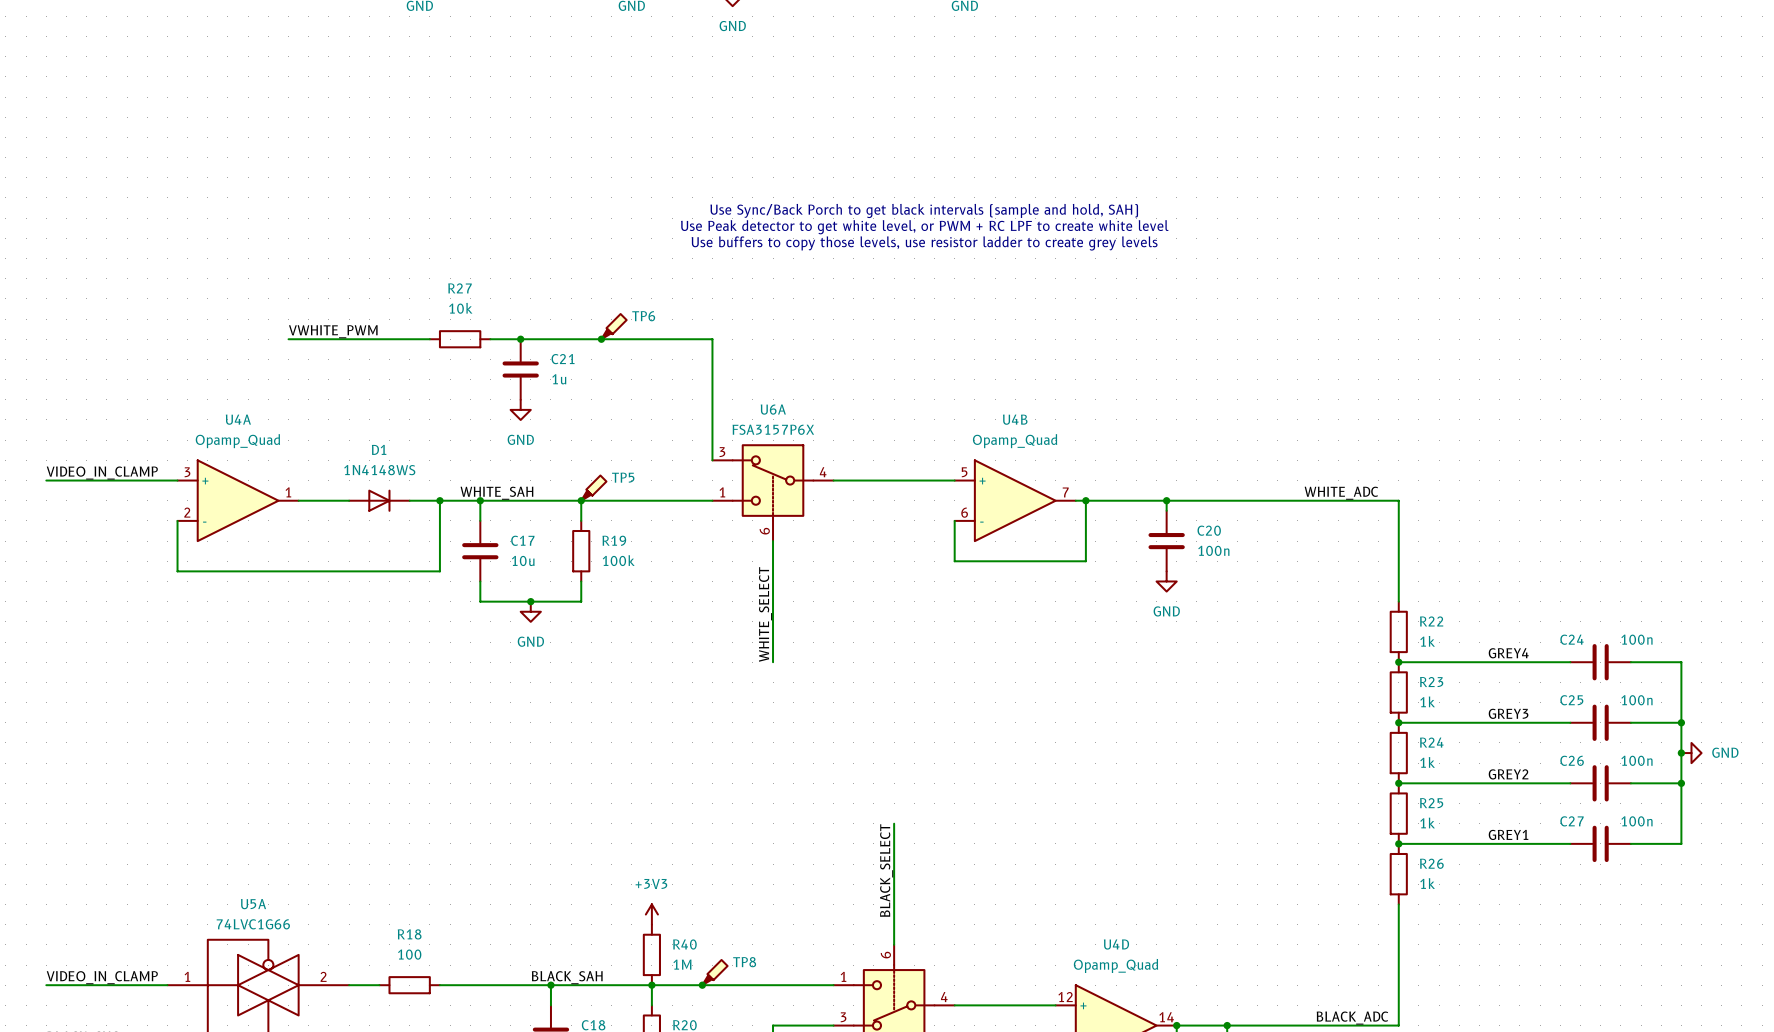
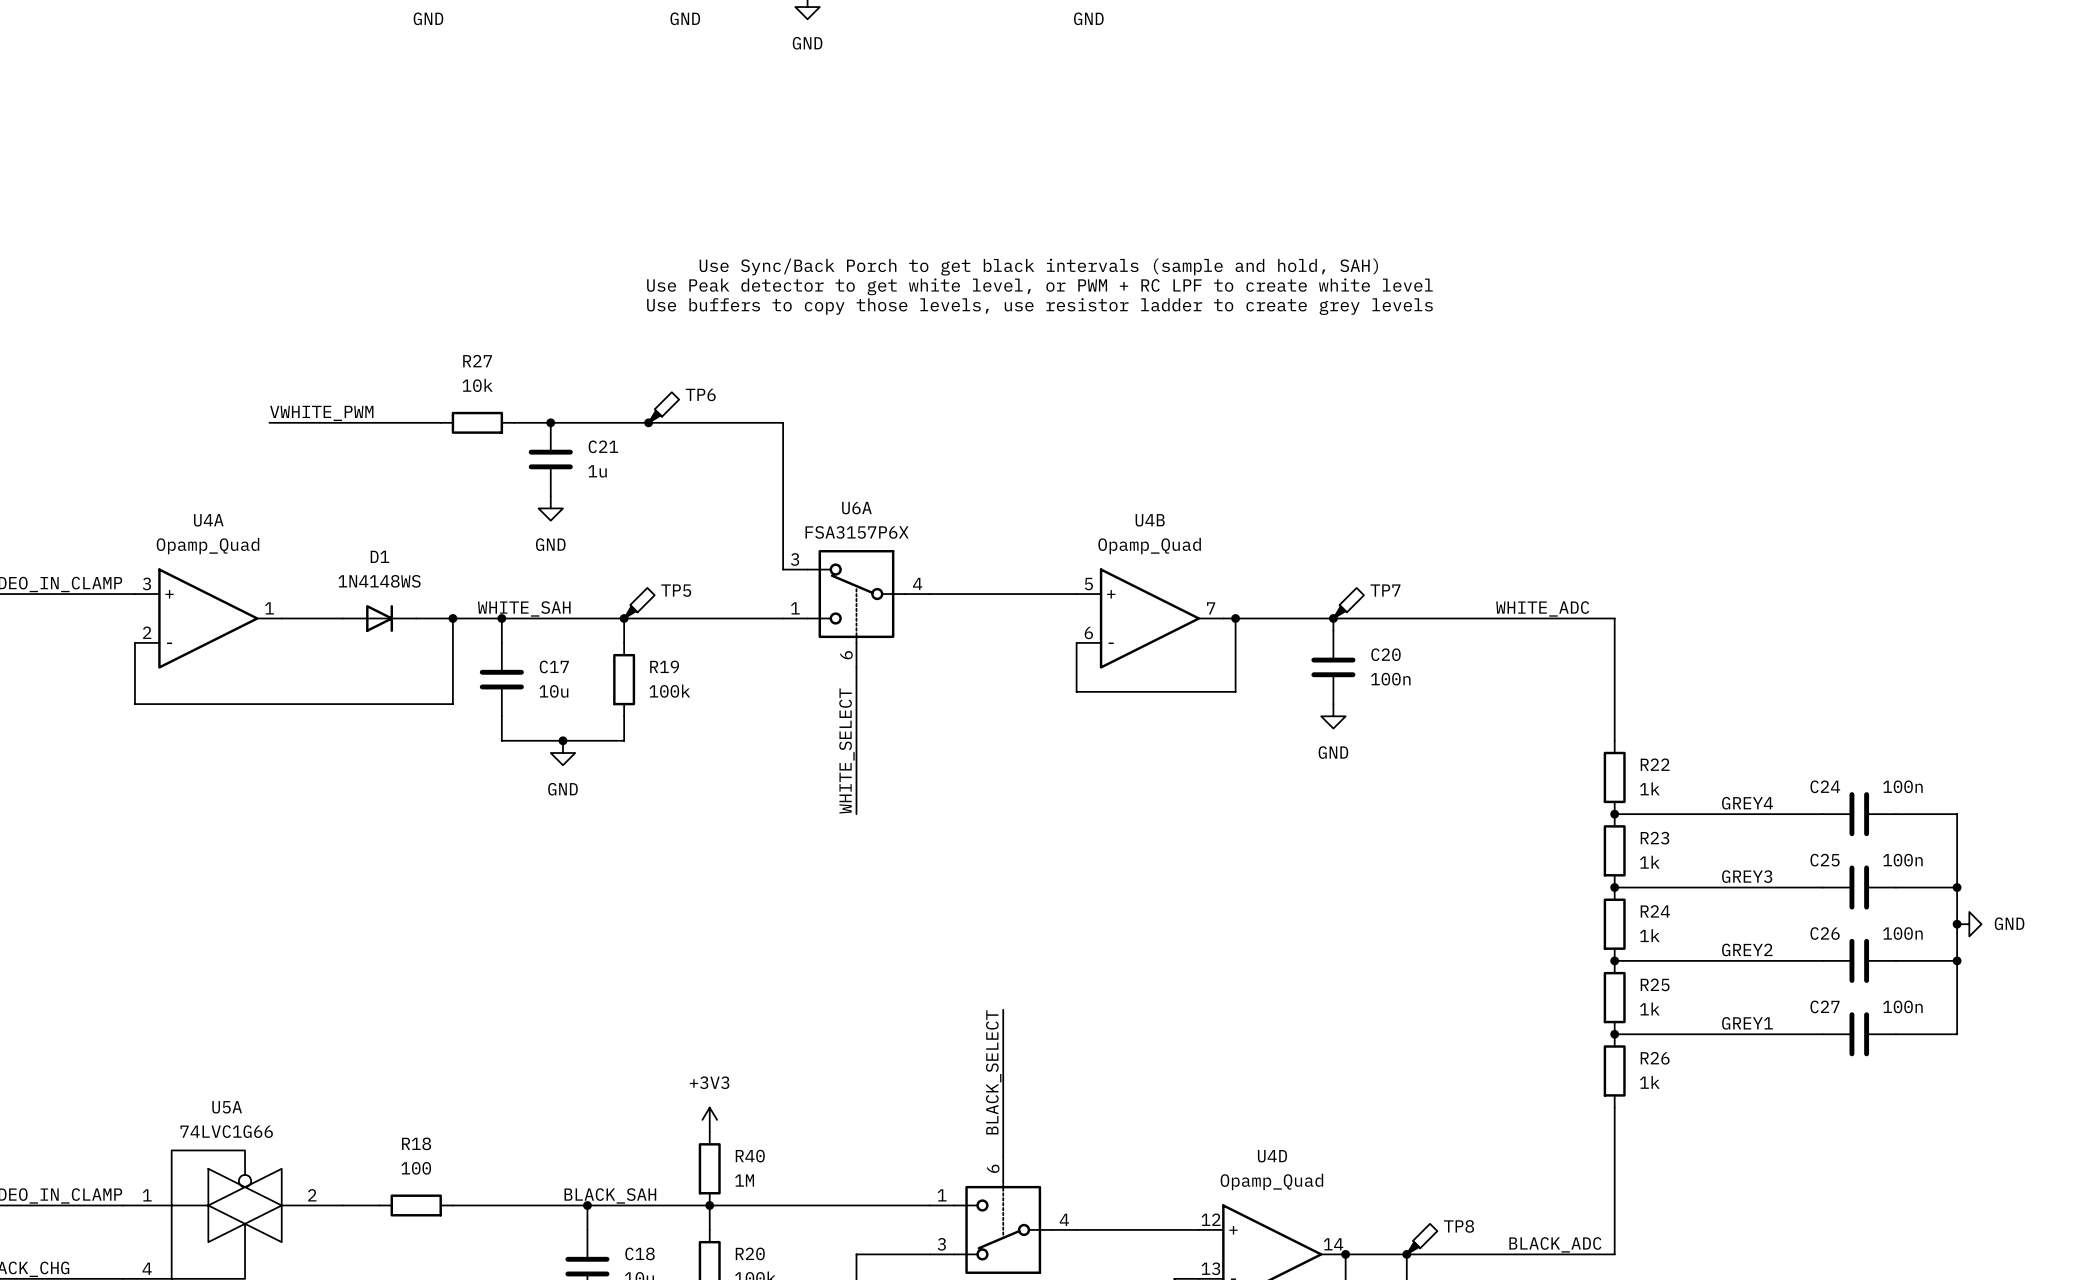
TP7: none -> (1348, 603)
TP8 position: (714, 972) -> (1422, 1239)
junction: (702, 985) -> none

